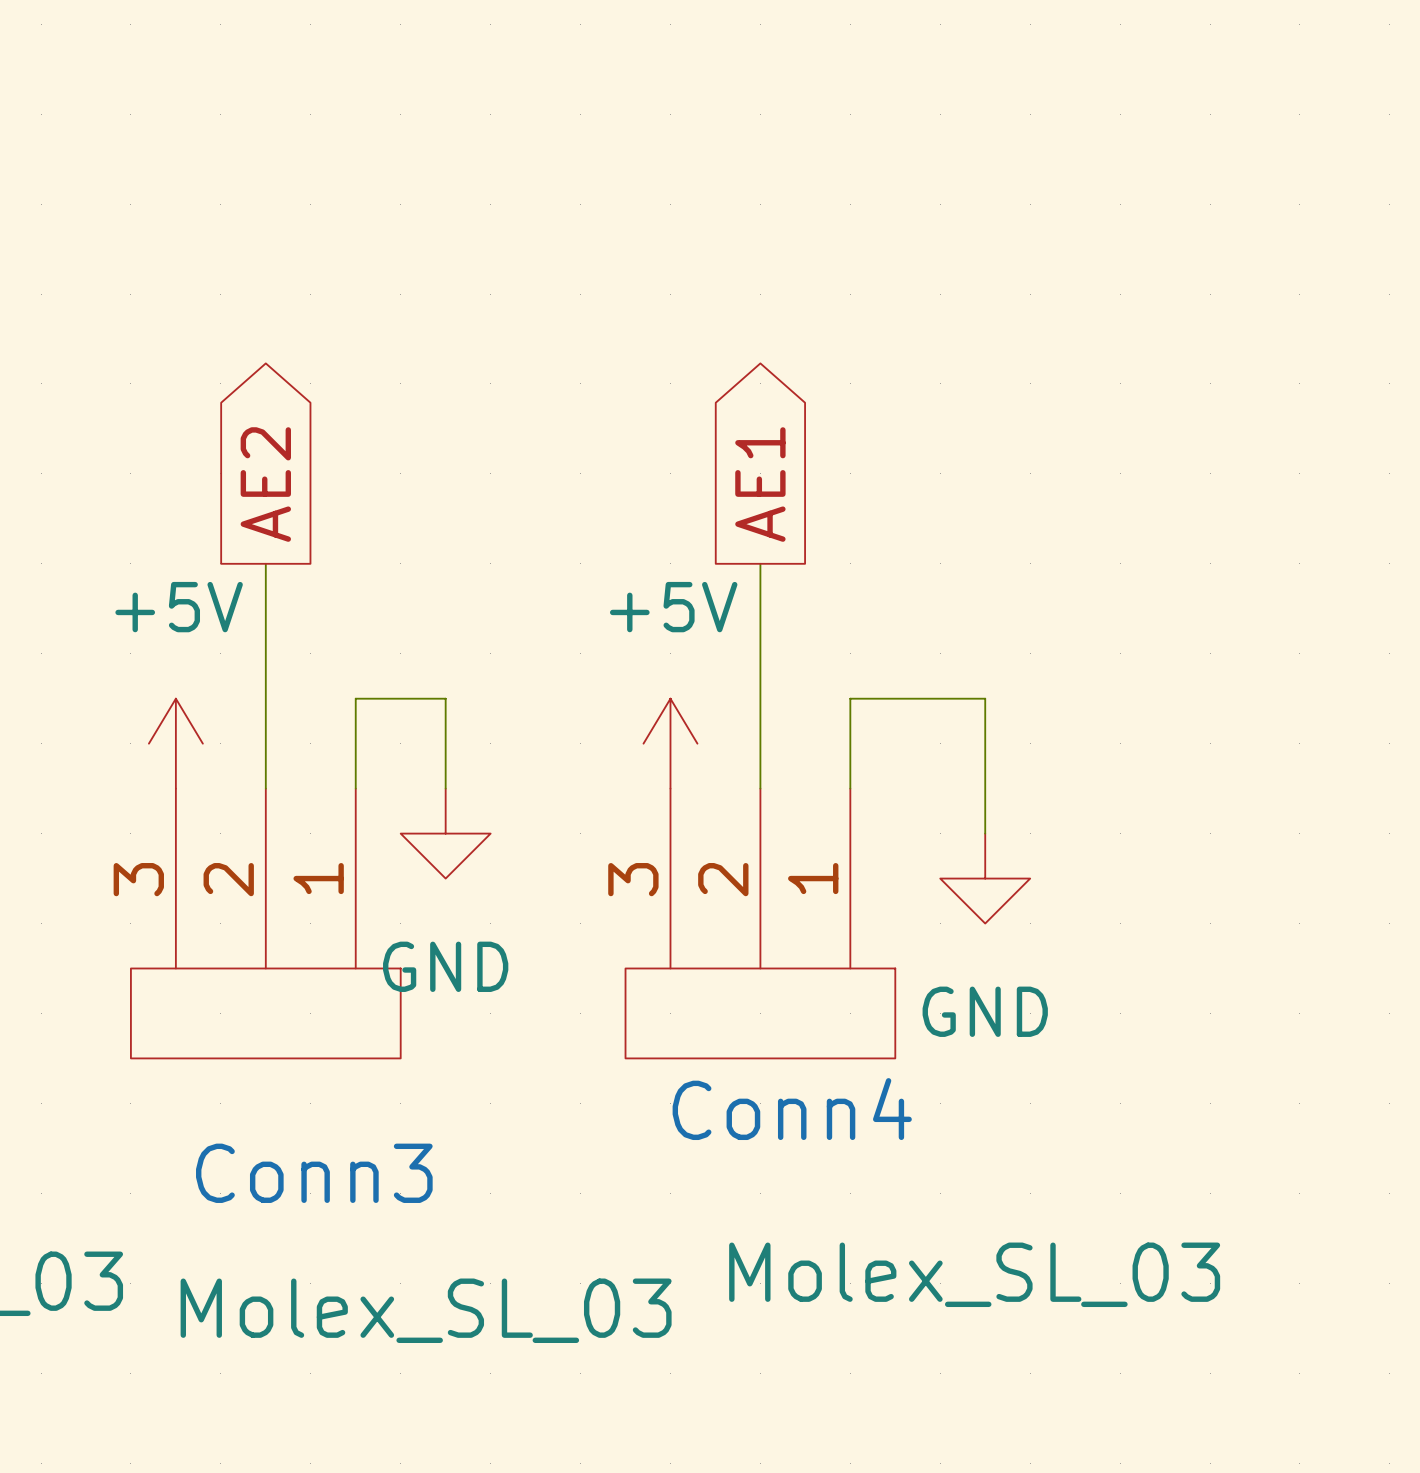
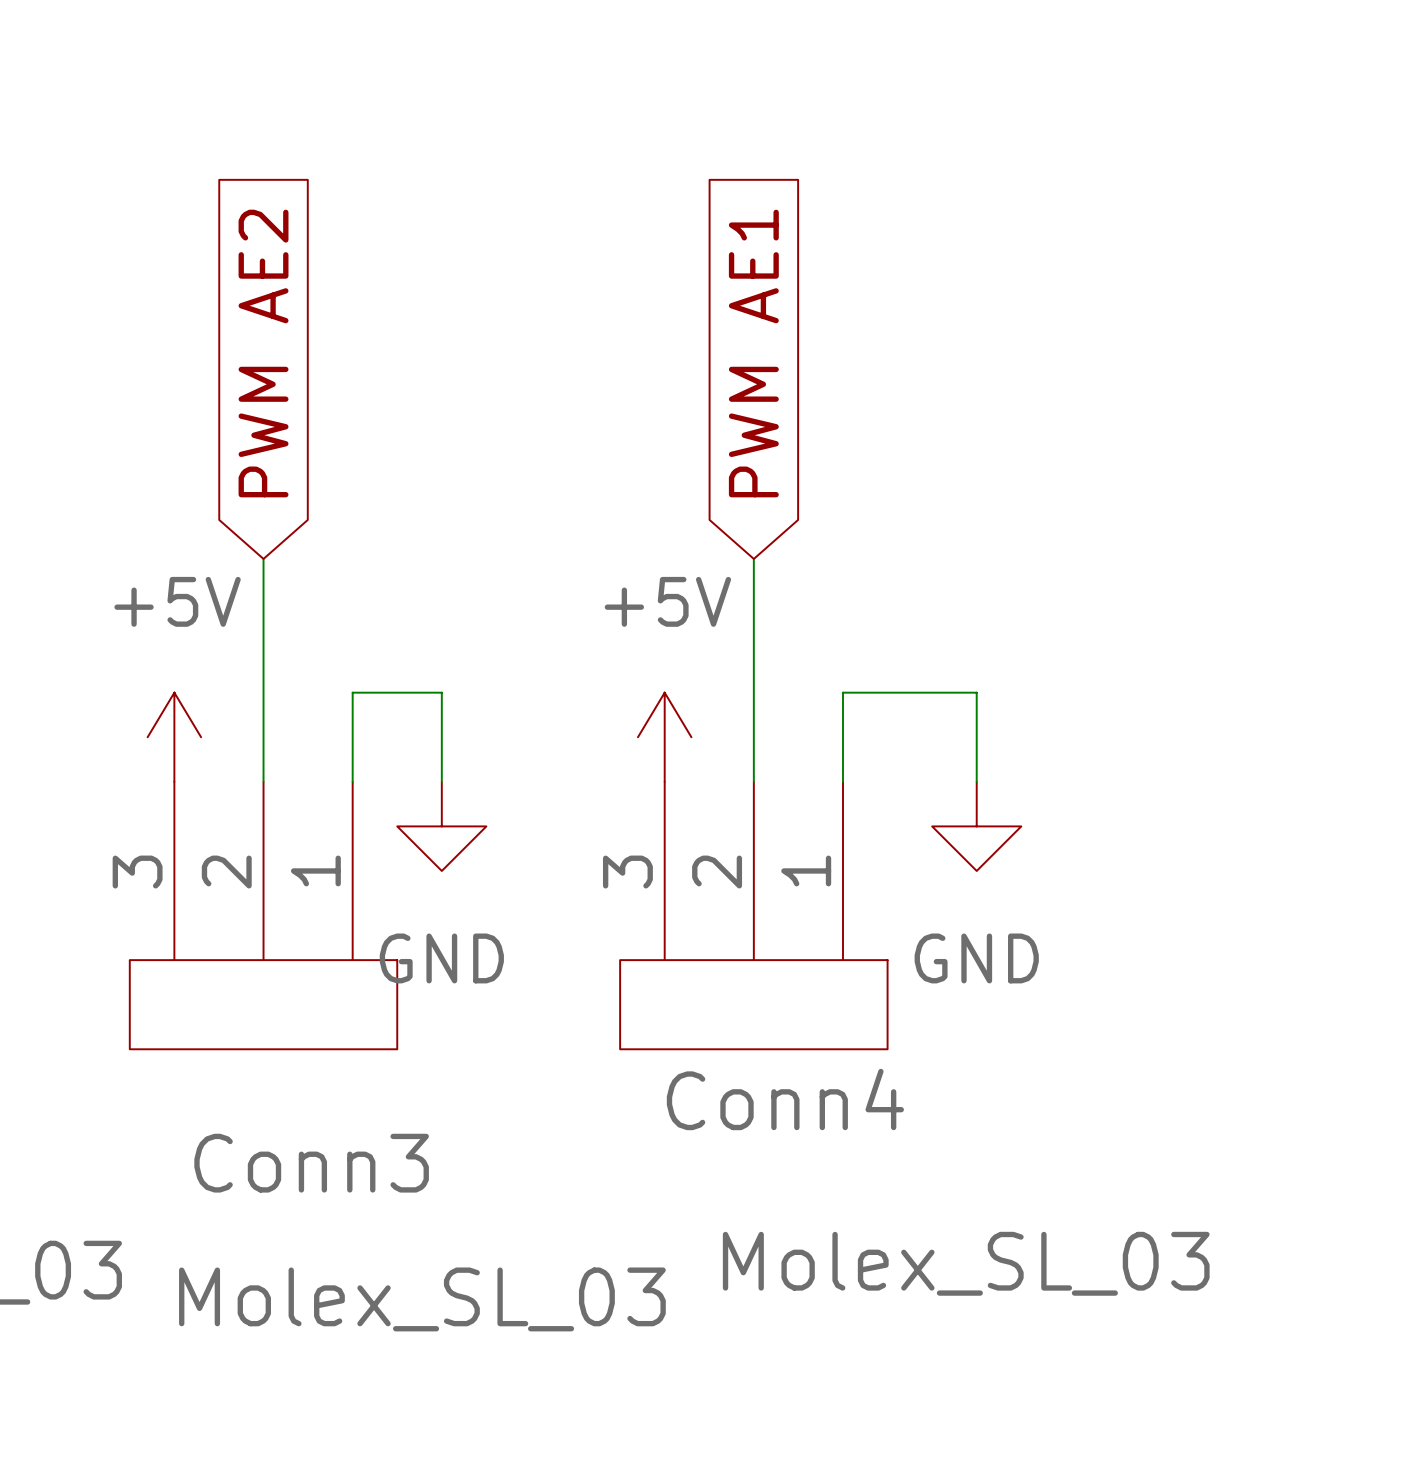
global label shape: output (265, 484) -> input (263, 353)
global label: AE2 (265, 484) -> PWM AE2 (263, 353)
global label shape: output (760, 484) -> input (753, 353)
global label: AE1 (760, 484) -> PWM AE1 (753, 353)
power symbol position: GND (985, 878) -> GND (976, 826)

